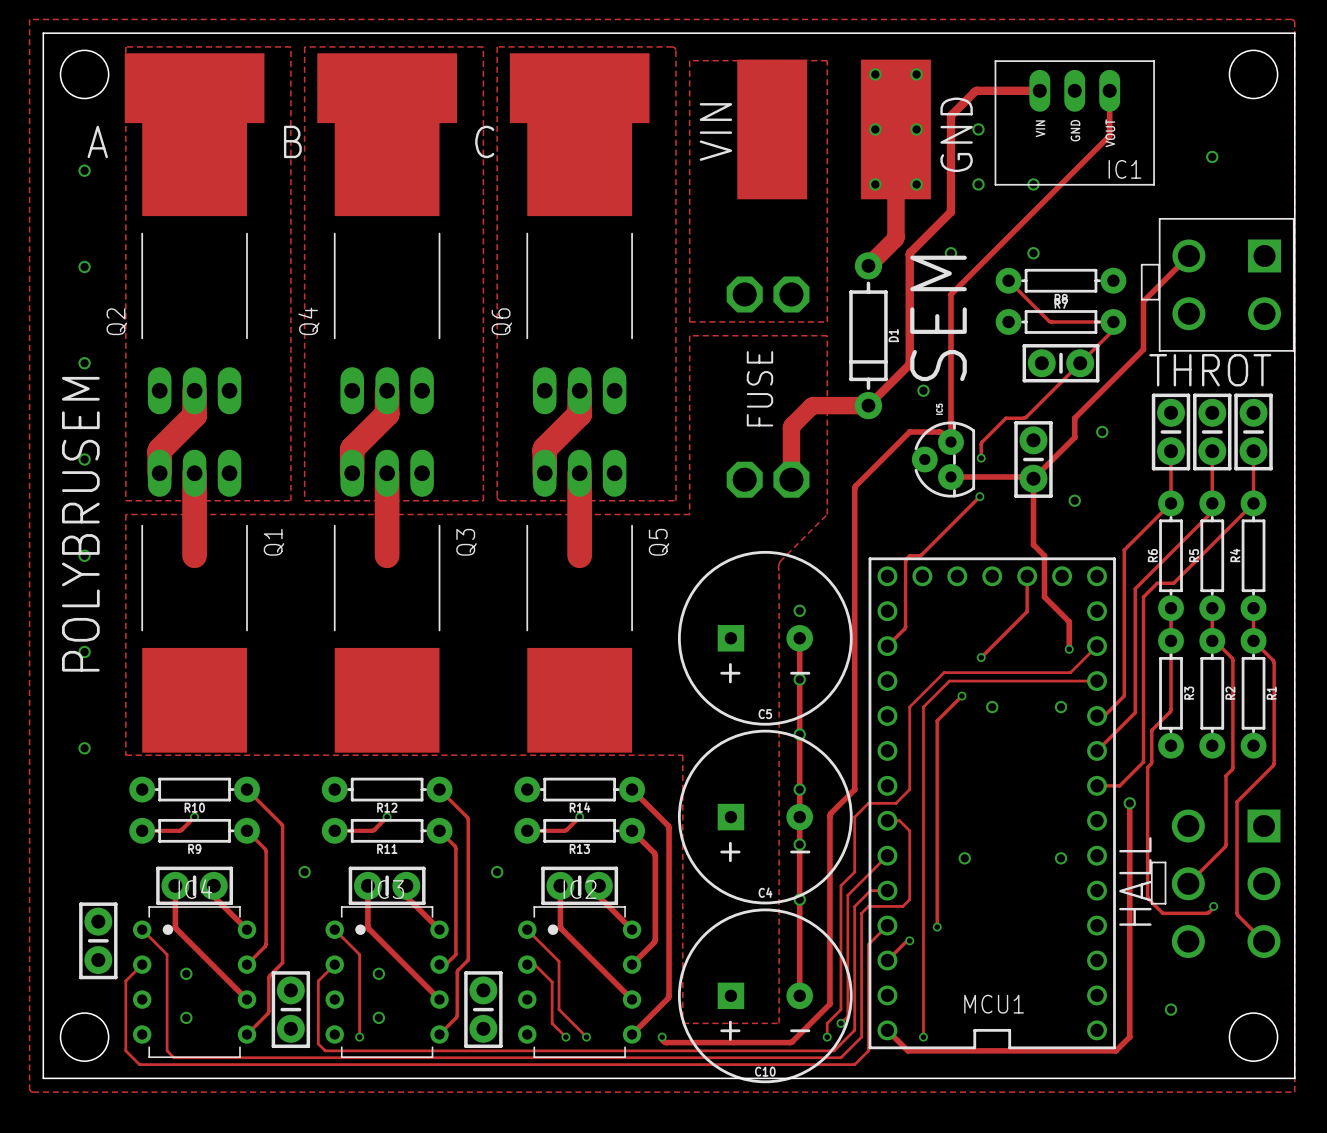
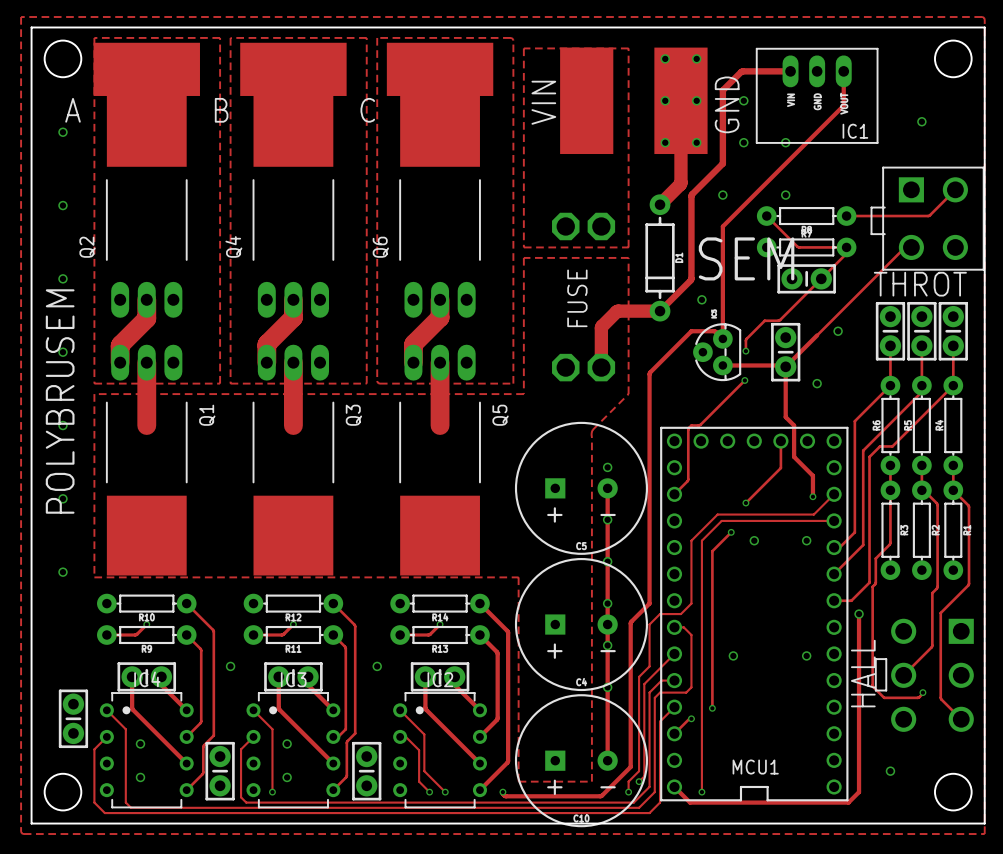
part footprint: [1140, 217, 1295, 352] -> [870, 166, 985, 271]
track: none -> (955, 189) (928, 215) (846, 216)
track: (1188, 255) (1143, 301) (1143, 349) (1074, 418) (1074, 437) -> (911, 247) (904, 248) (817, 335)
text rotation: 0° (938, 318) -> 90° clockwise (746, 258)

